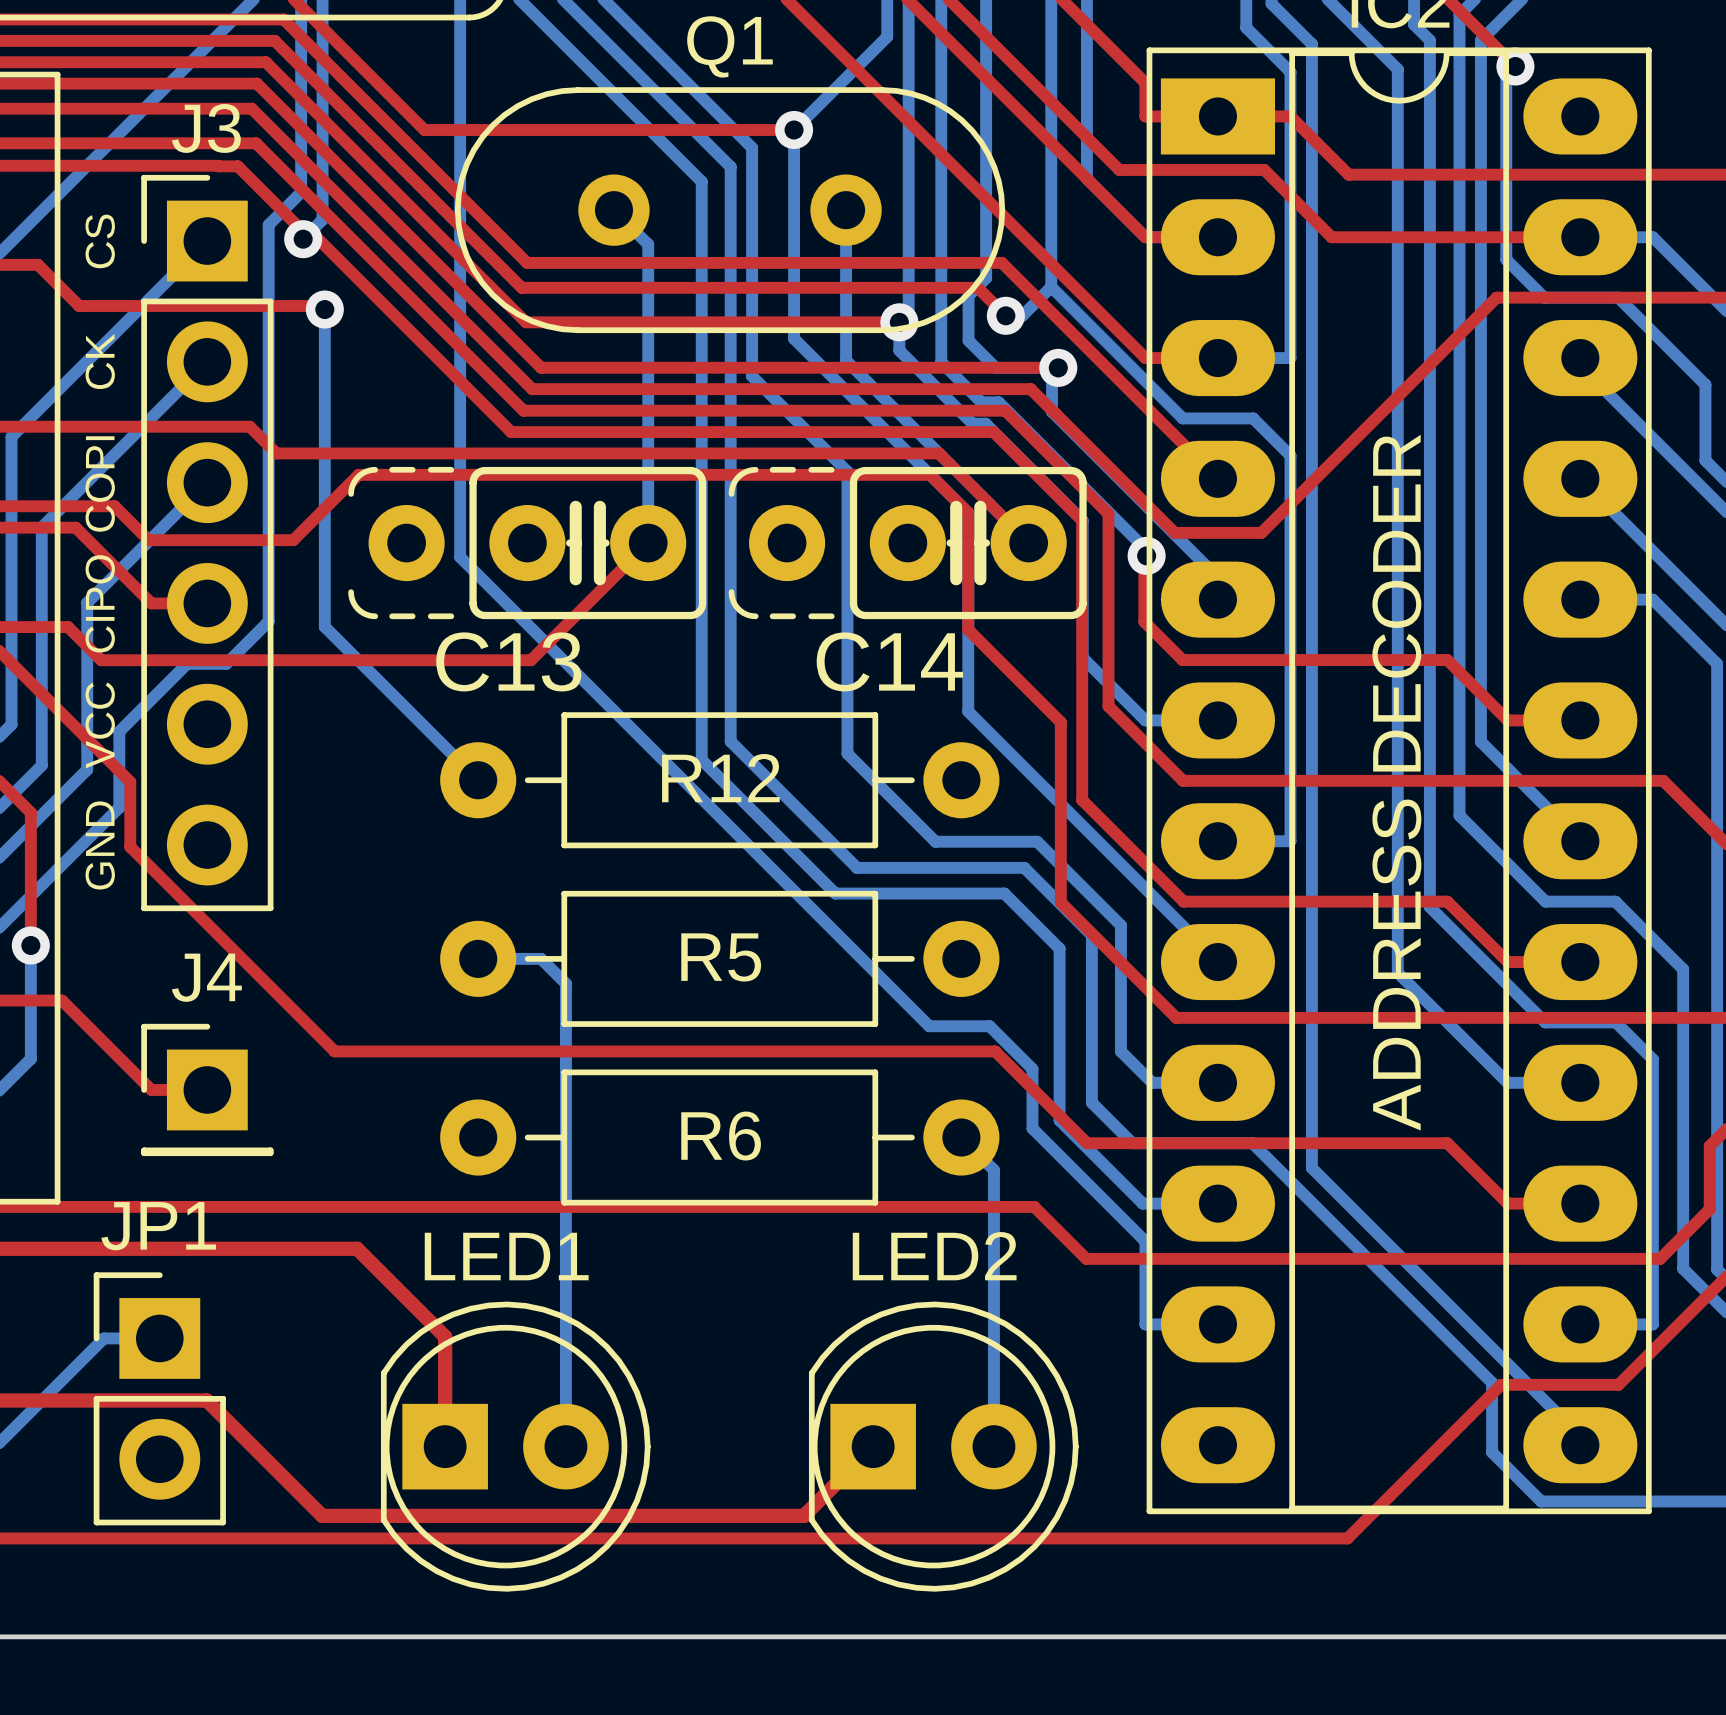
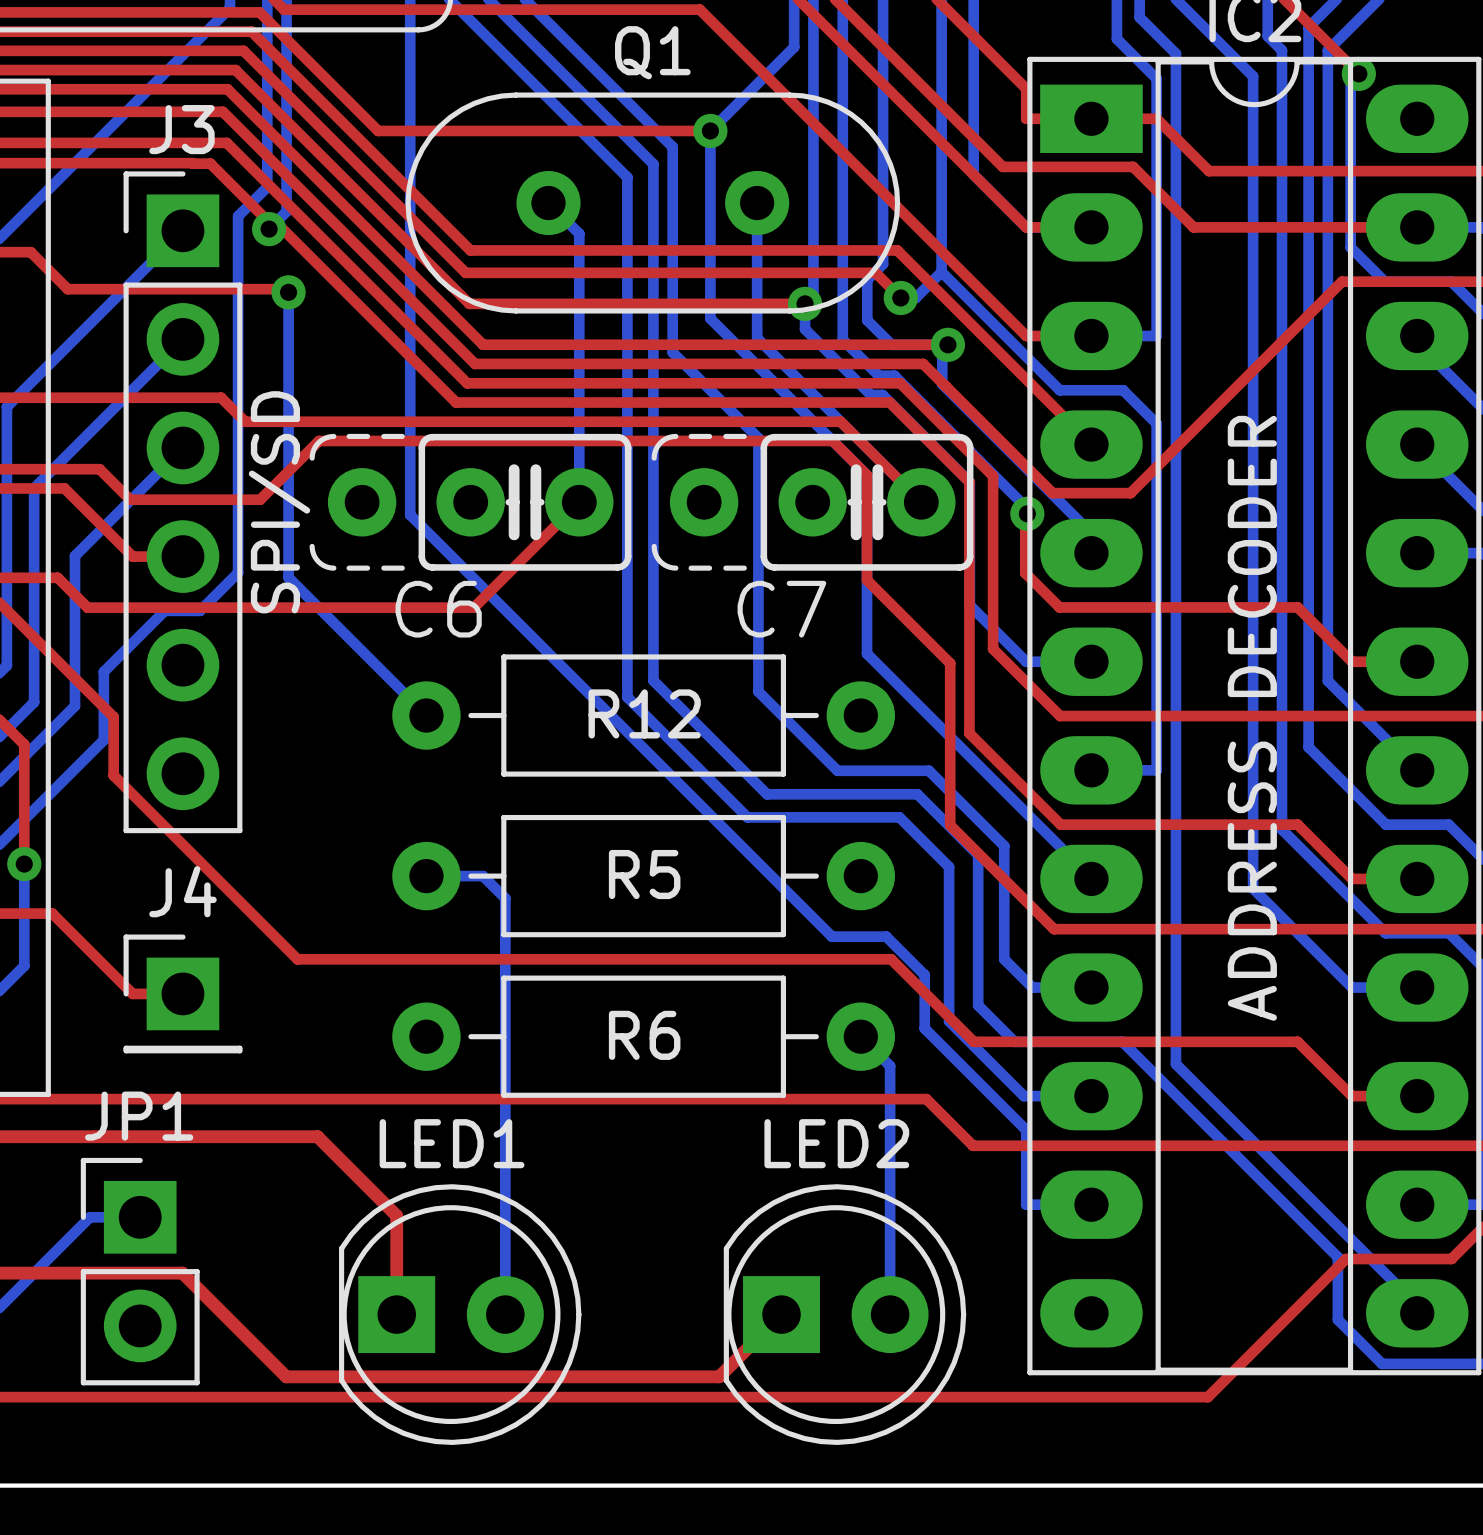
text: CS (100, 241) -> none
text: CK (100, 361) -> none
text: COPI (100, 483) -> none
text: none -> SPI/SD (279, 502)
text: CIPO (100, 603) -> none
C13 name: C13 (508, 661) -> C6 (438, 609)
C14 name: C14 (889, 661) -> C7 (781, 609)
text: VCC (100, 725) -> none
text: GND (100, 845) -> none

